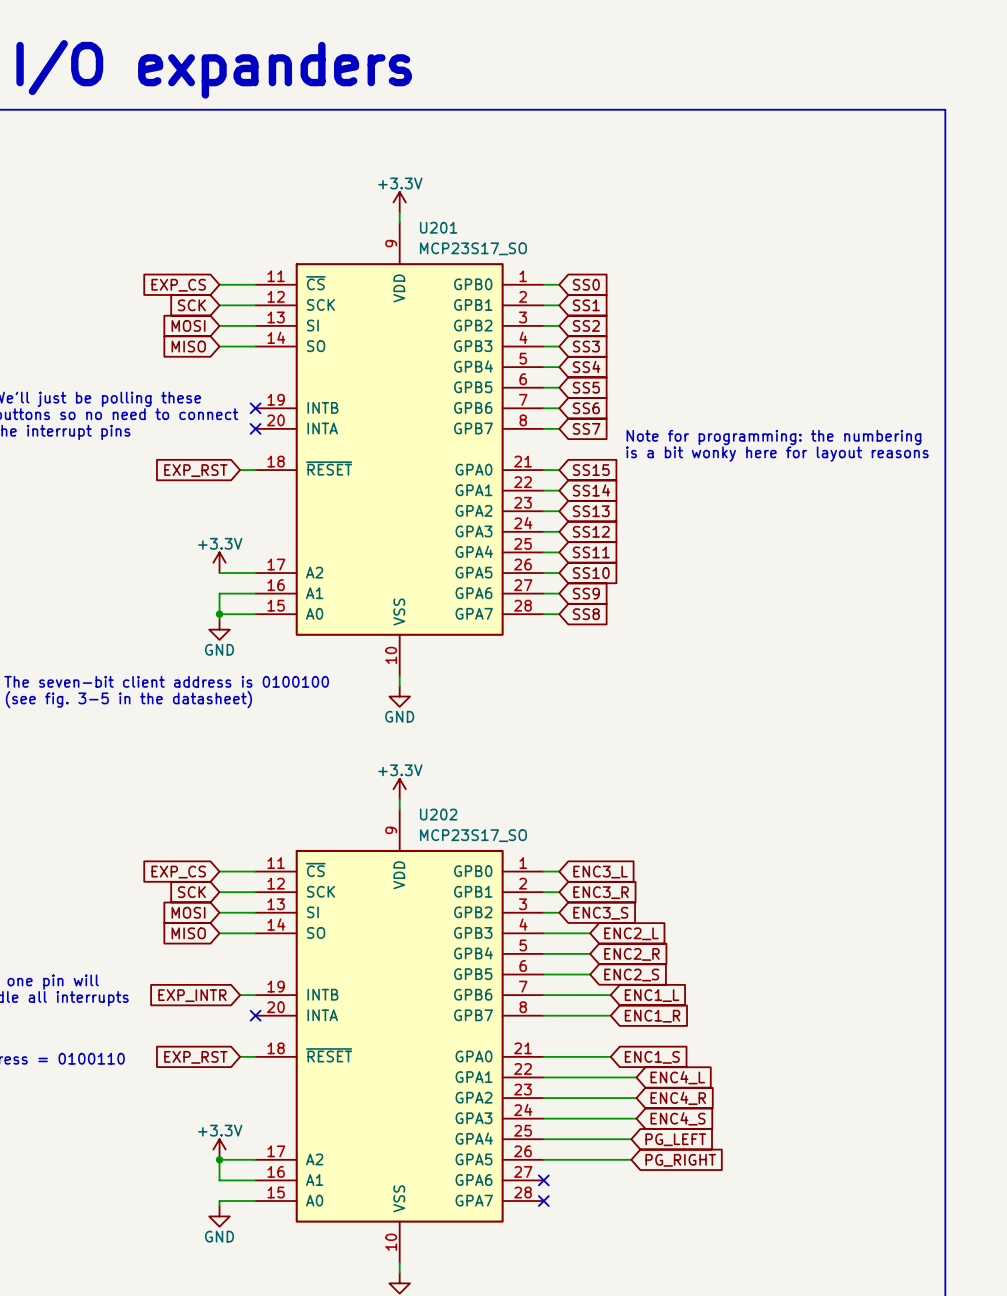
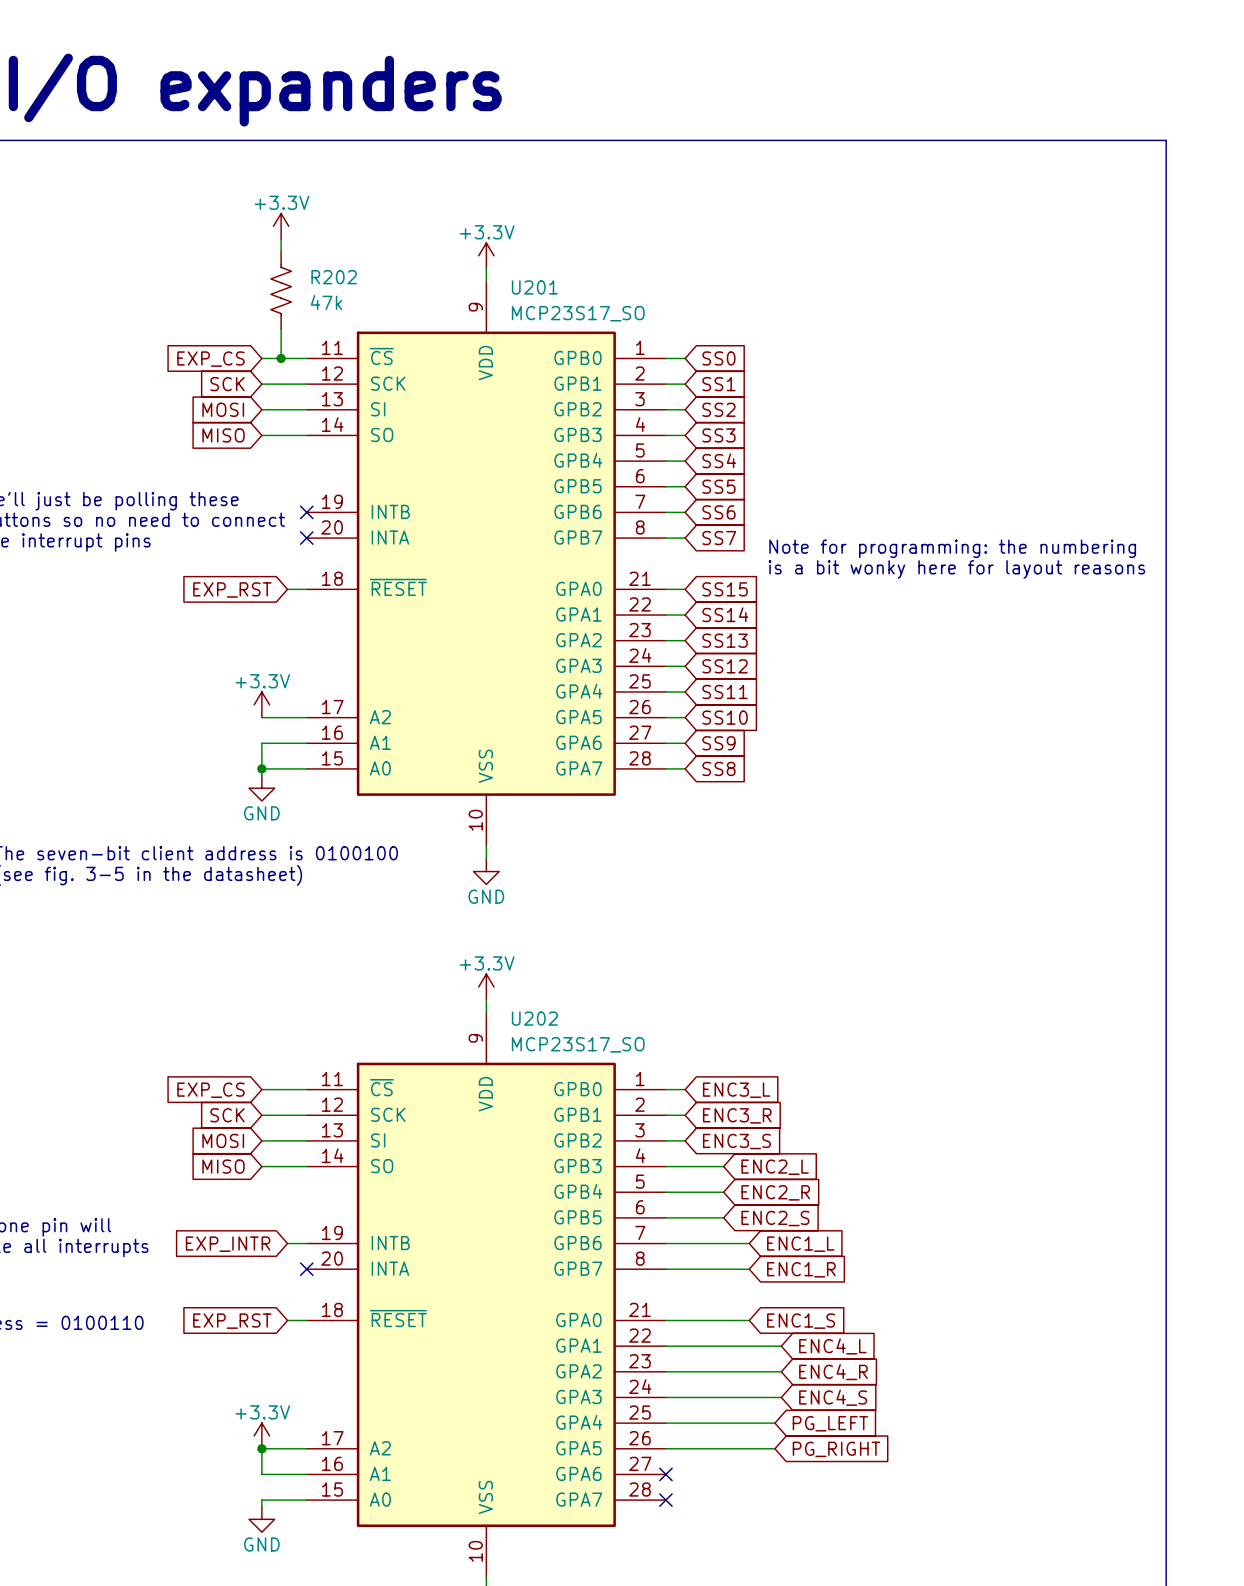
power symbol: none -> +3.3V (281, 226)
wire: none -> (281, 239) (281, 252)
R202: none -> 47k (281, 290)
wire: none -> (281, 328) (281, 358)
junction: none -> (281, 358)

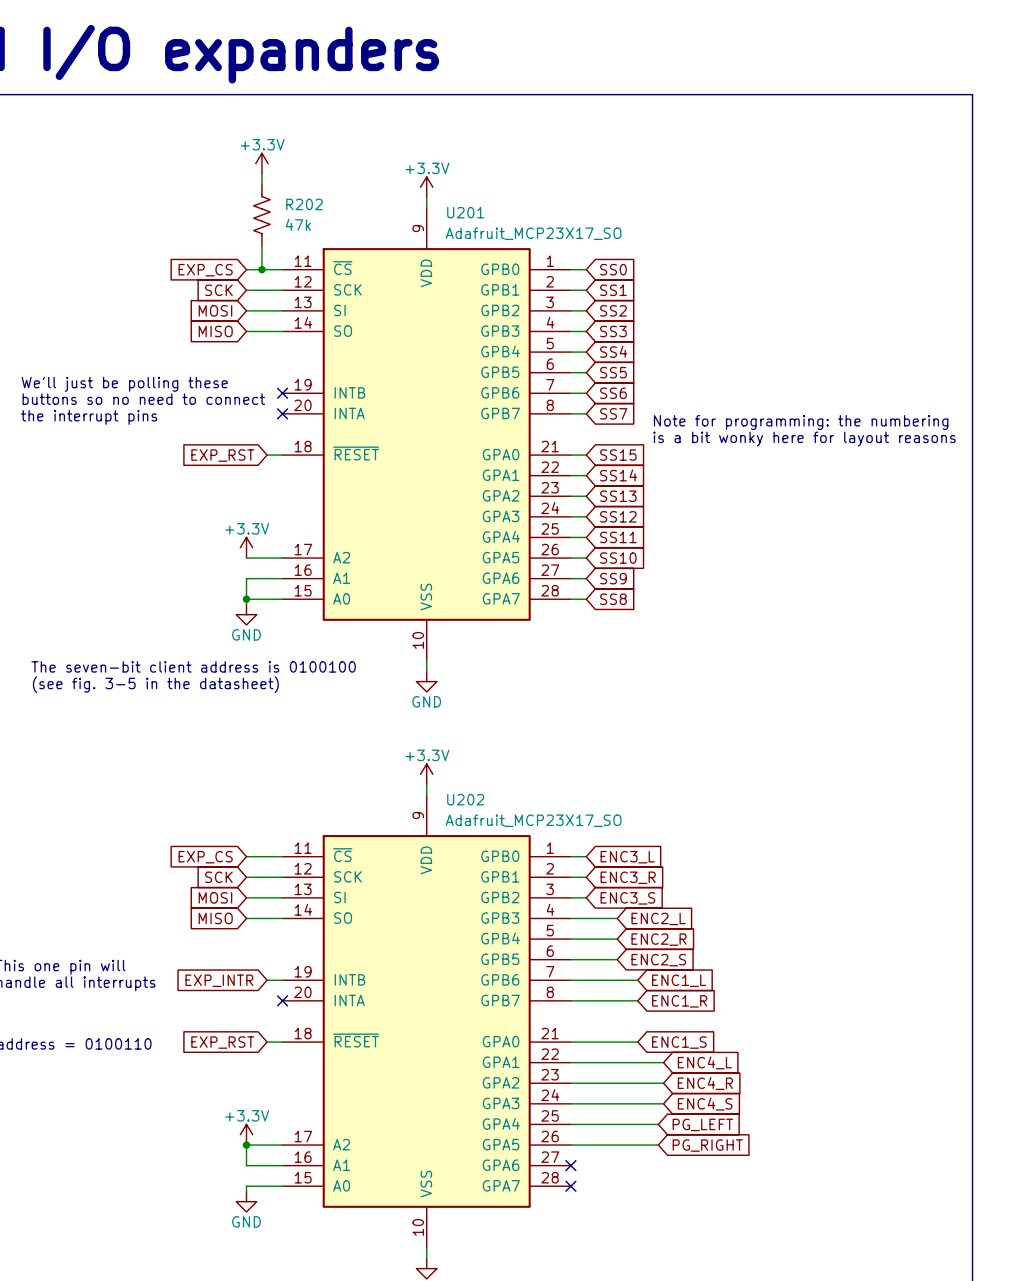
U201 value: MCP23S17_SO (578, 313) -> Adafruit_MCP23X17_SO (533, 233)
U202 value: MCP23S17_SO (578, 1044) -> Adafruit_MCP23X17_SO (533, 820)

